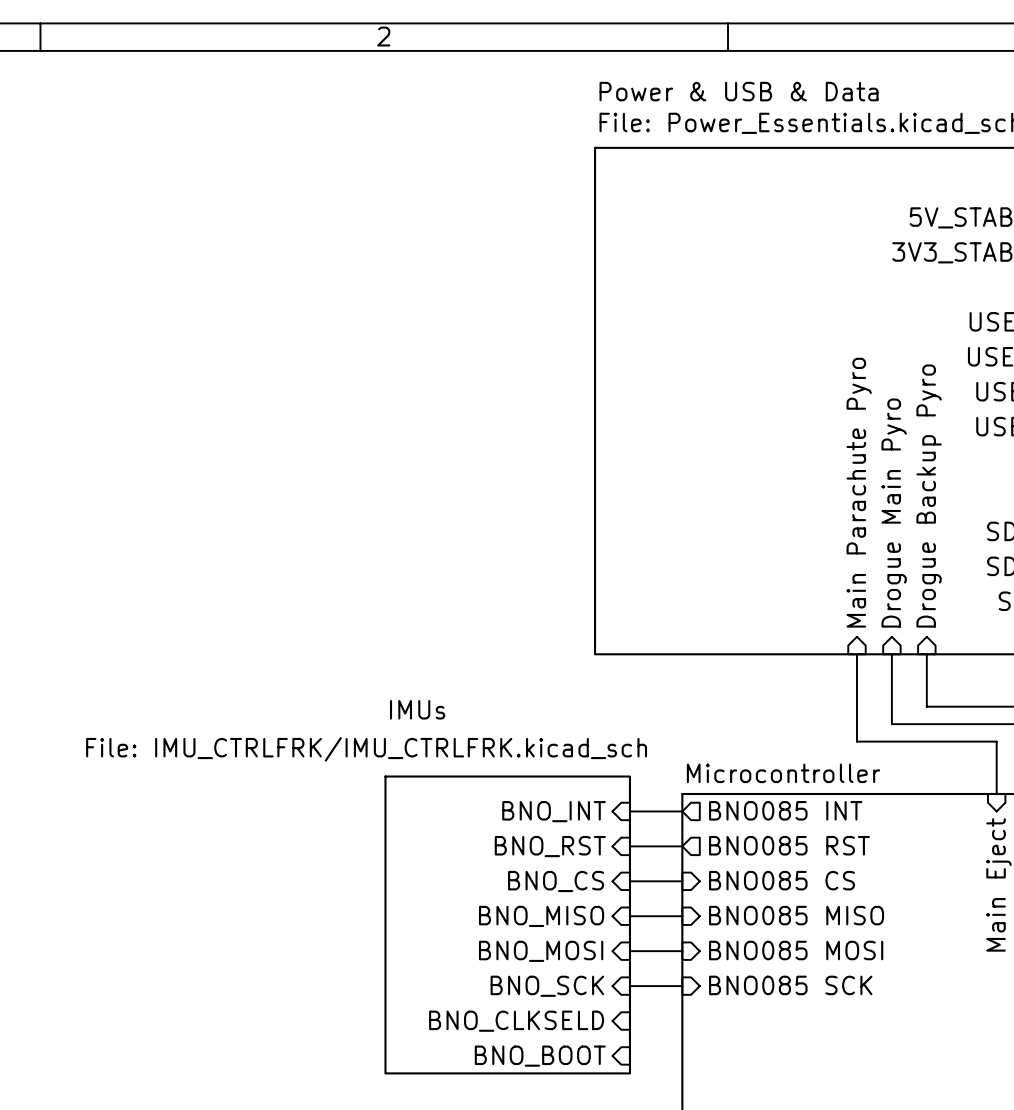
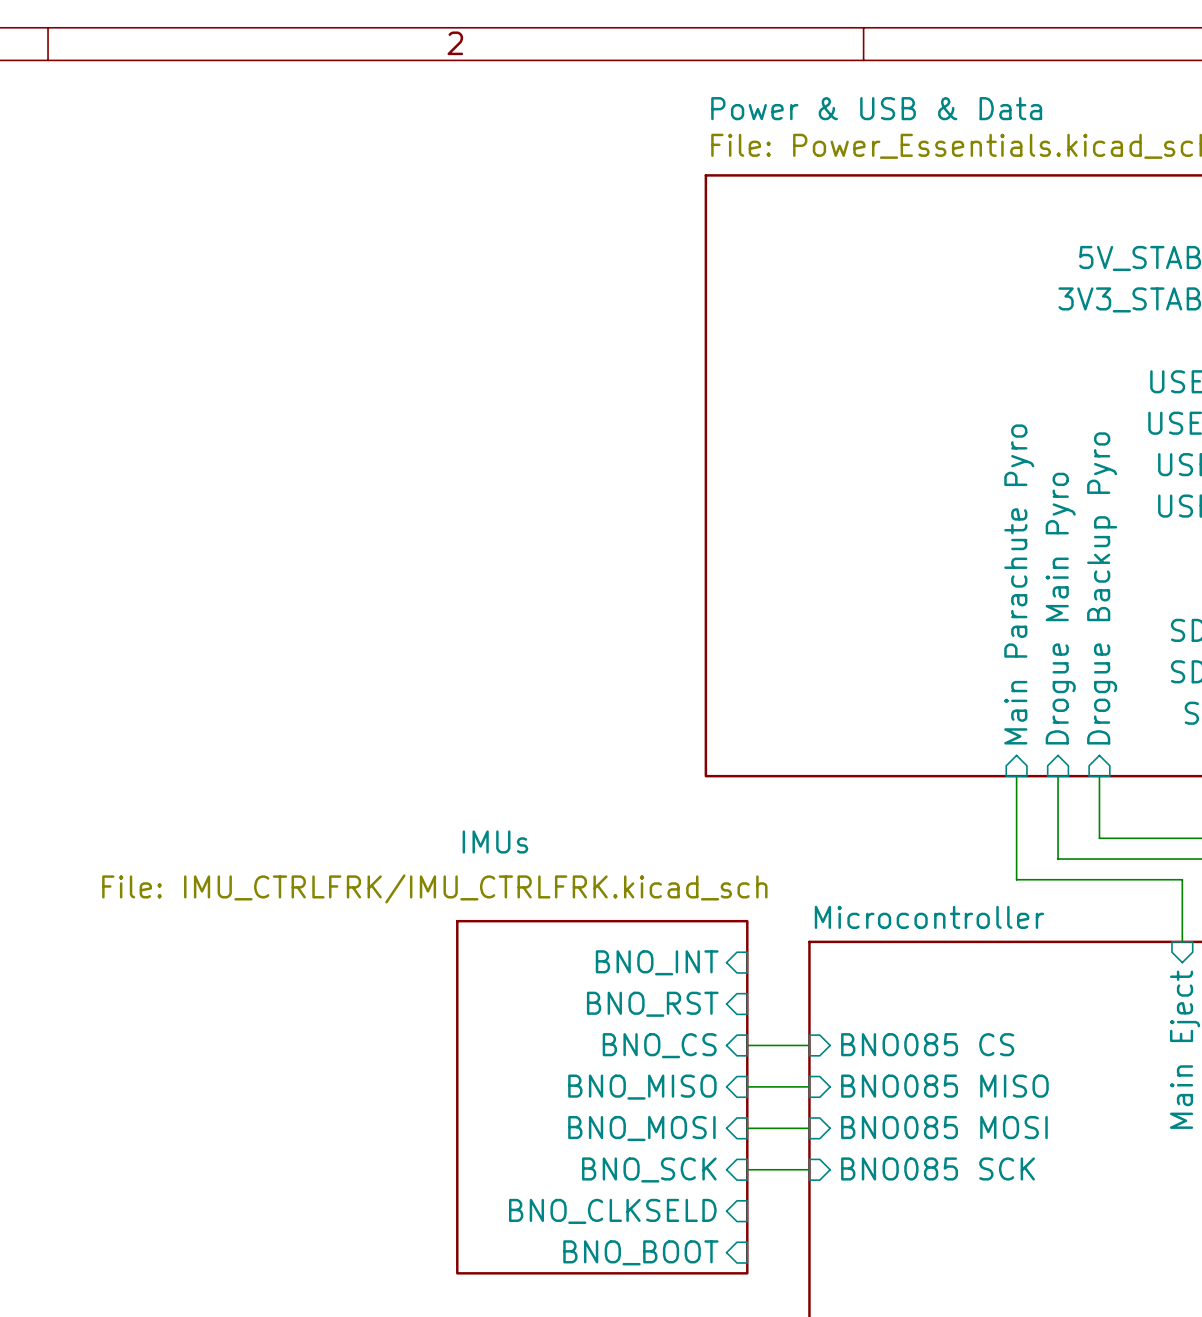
sheet pin: BNO085 INT (785, 810) -> none
wire: (629, 811) (682, 811) -> none
sheet pin: BNO085 RST (789, 845) -> none
wire: (629, 846) (682, 846) -> none

